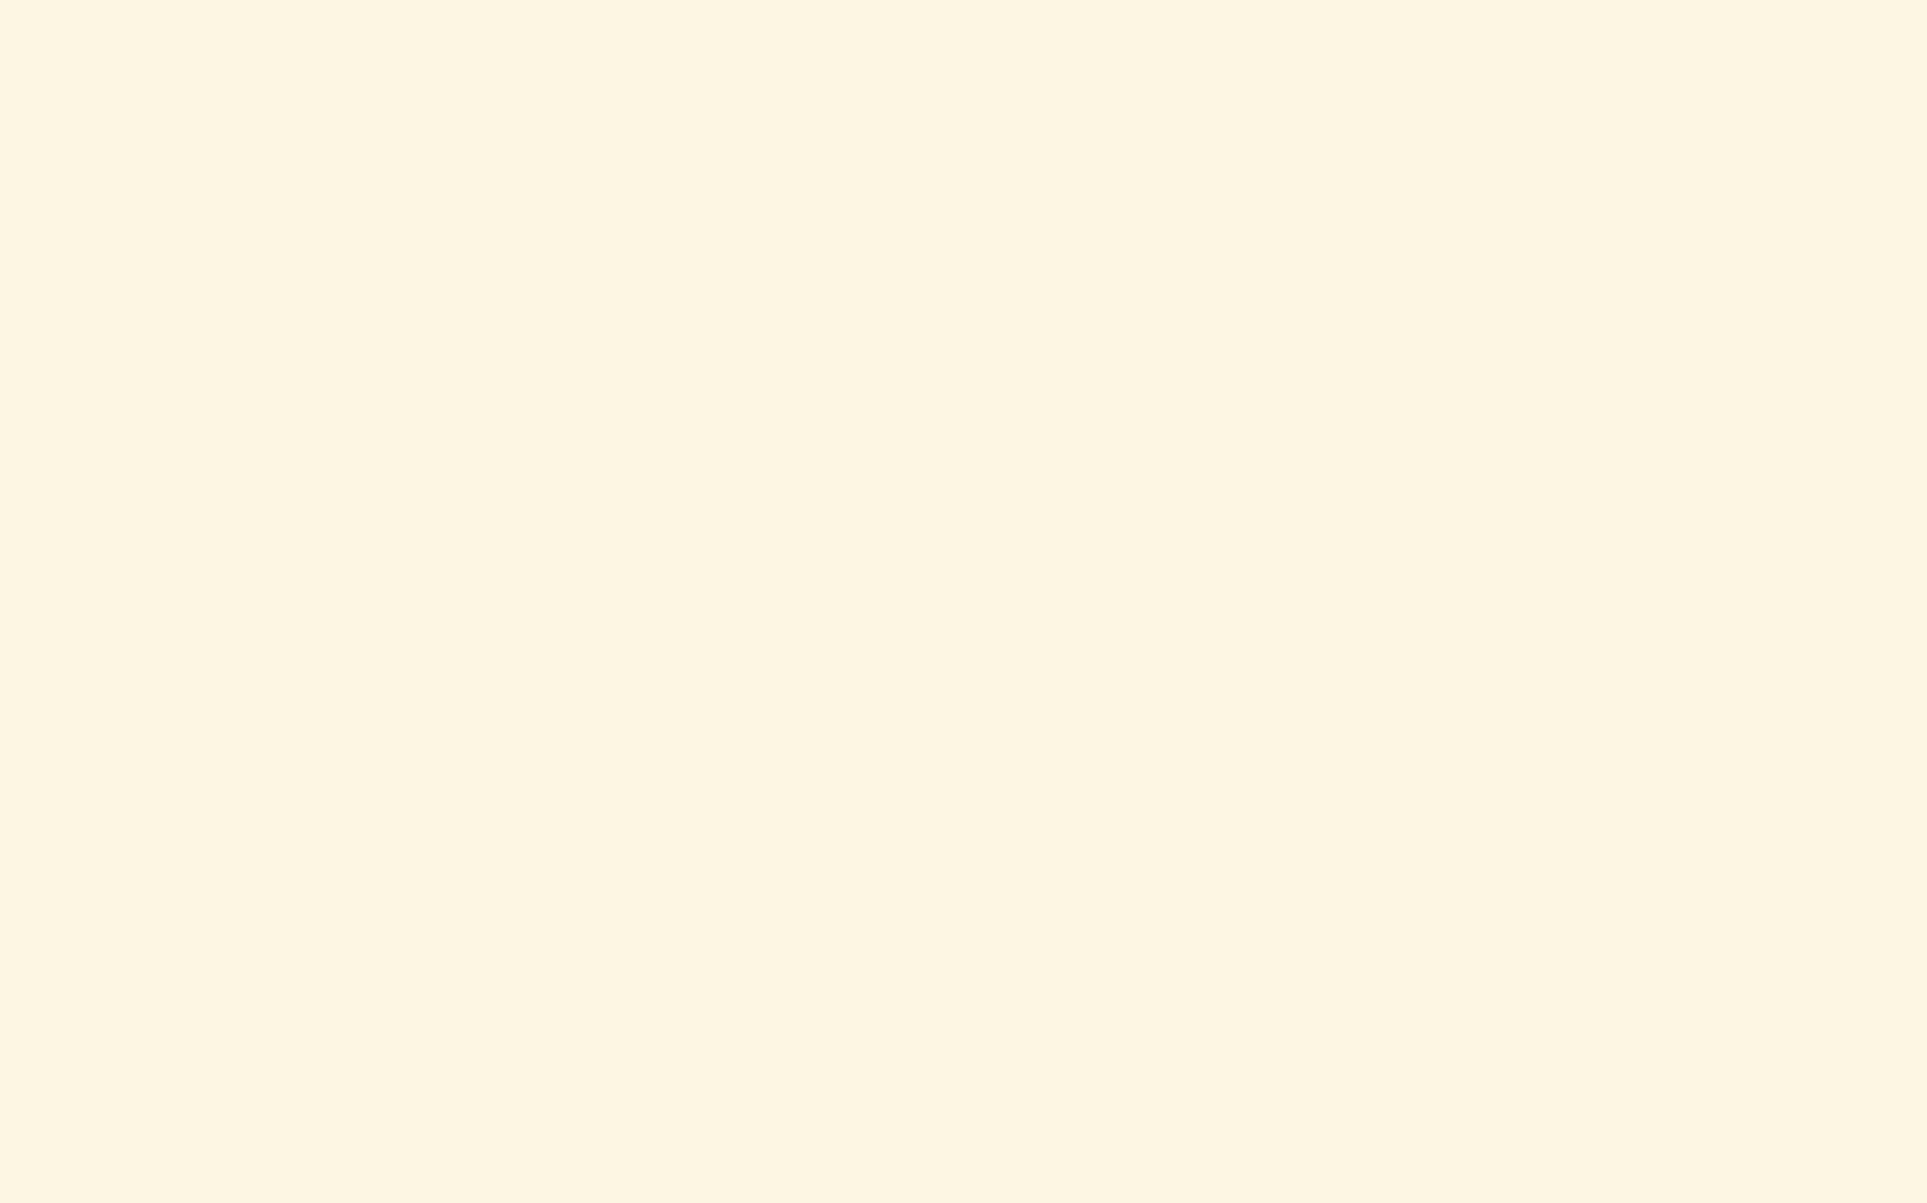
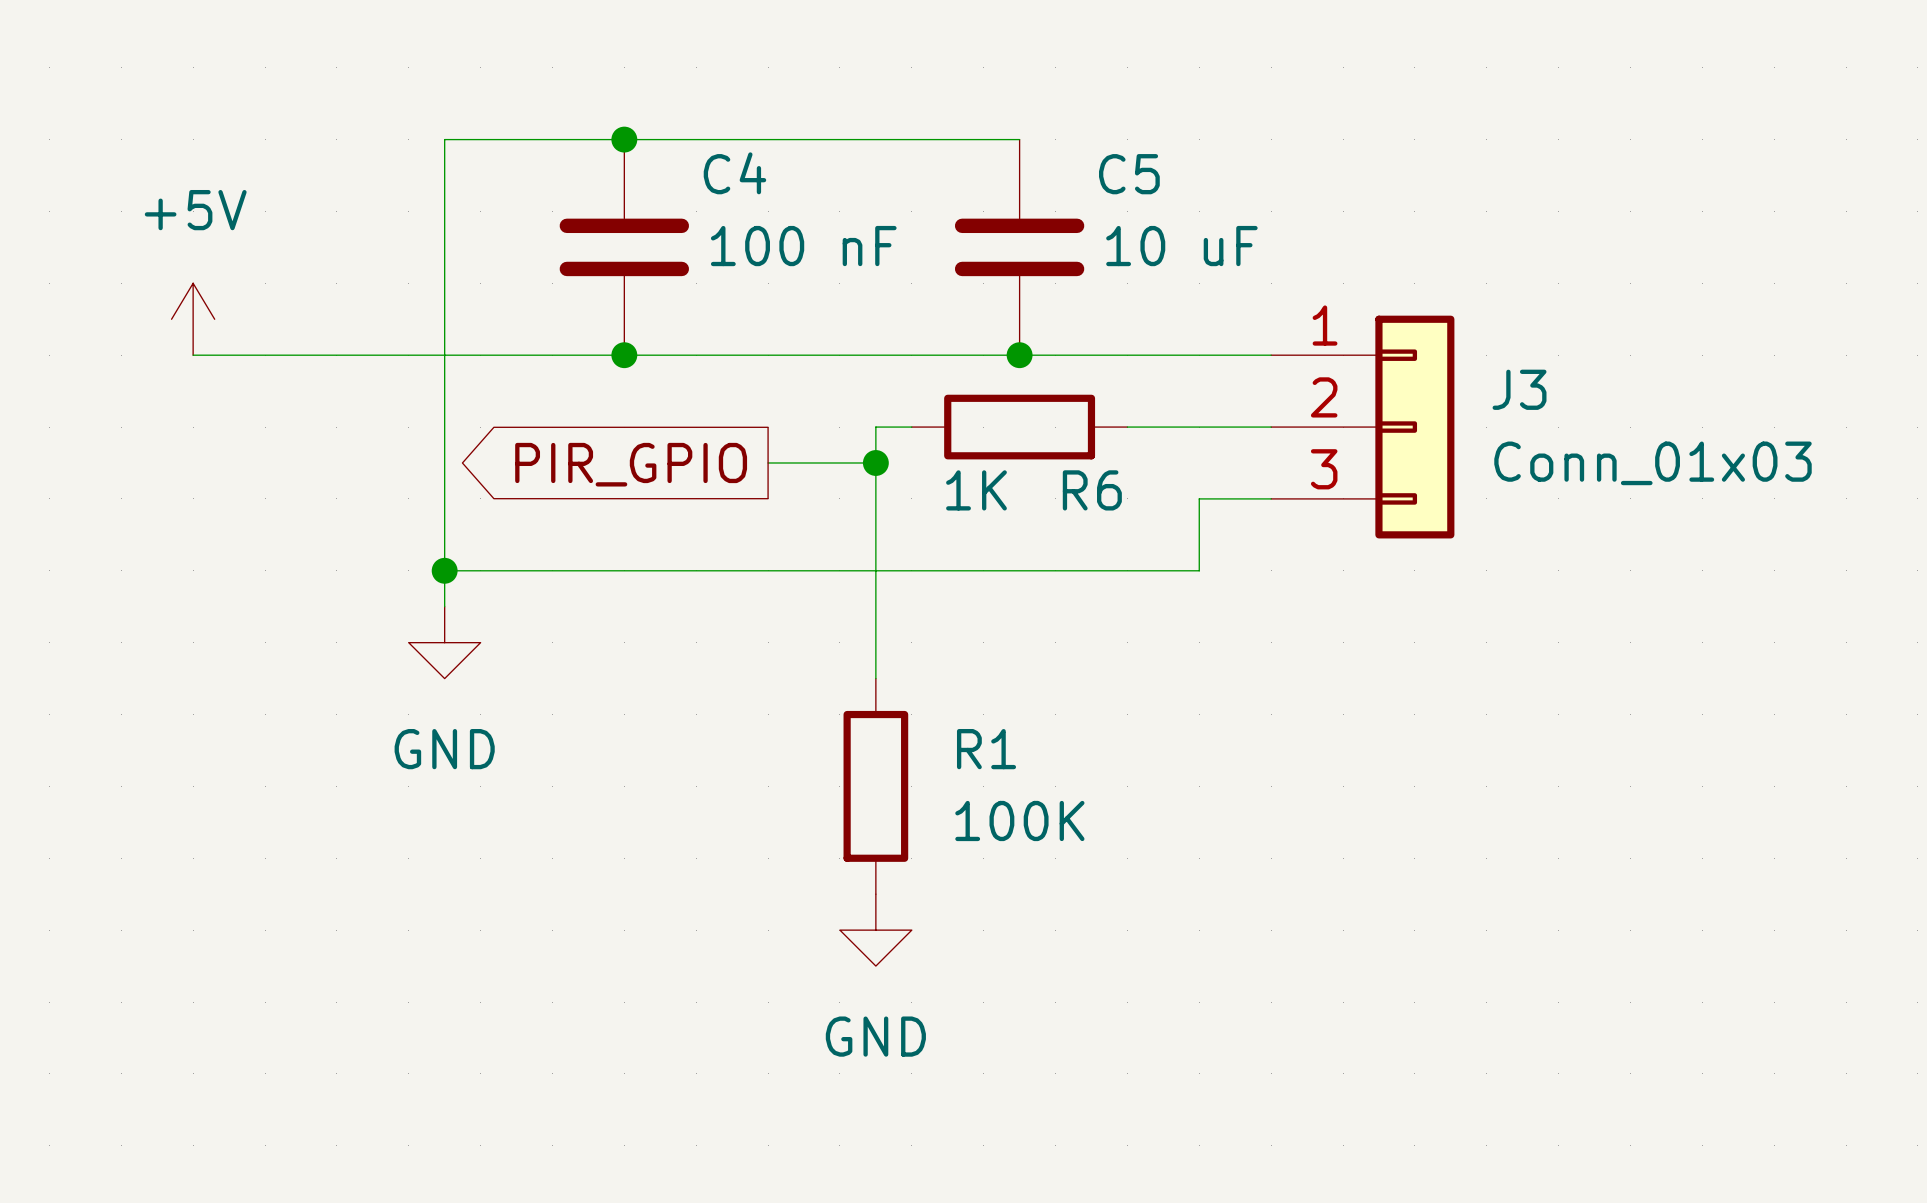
junction: none -> (624, 139)
wire: none -> (1019, 139) (444, 139) (444, 606)
C4: none -> 100 nF (624, 247)
C5: none -> 10 uF (1019, 247)
power symbol: none -> +5V (193, 319)
wire: none -> (193, 355) (1271, 355)
junction: none -> (624, 355)
junction: none -> (1019, 355)
wire: none -> (911, 427) (875, 427) (875, 678)
R6: none -> 1K (1019, 427)
wire: none -> (1127, 427) (1271, 427)
J3: none -> Conn_01x03 (1362, 427)
wire: none -> (768, 462) (875, 462)
junction: none -> (875, 462)
global label: none -> PIR_GPIO (631, 464)
wire: none -> (1271, 498) (1199, 498) (1199, 570) (444, 570)
junction: none -> (444, 570)
power symbol: none -> GND (444, 642)
R1: none -> 100K (875, 786)
power symbol: none -> GND (875, 930)

